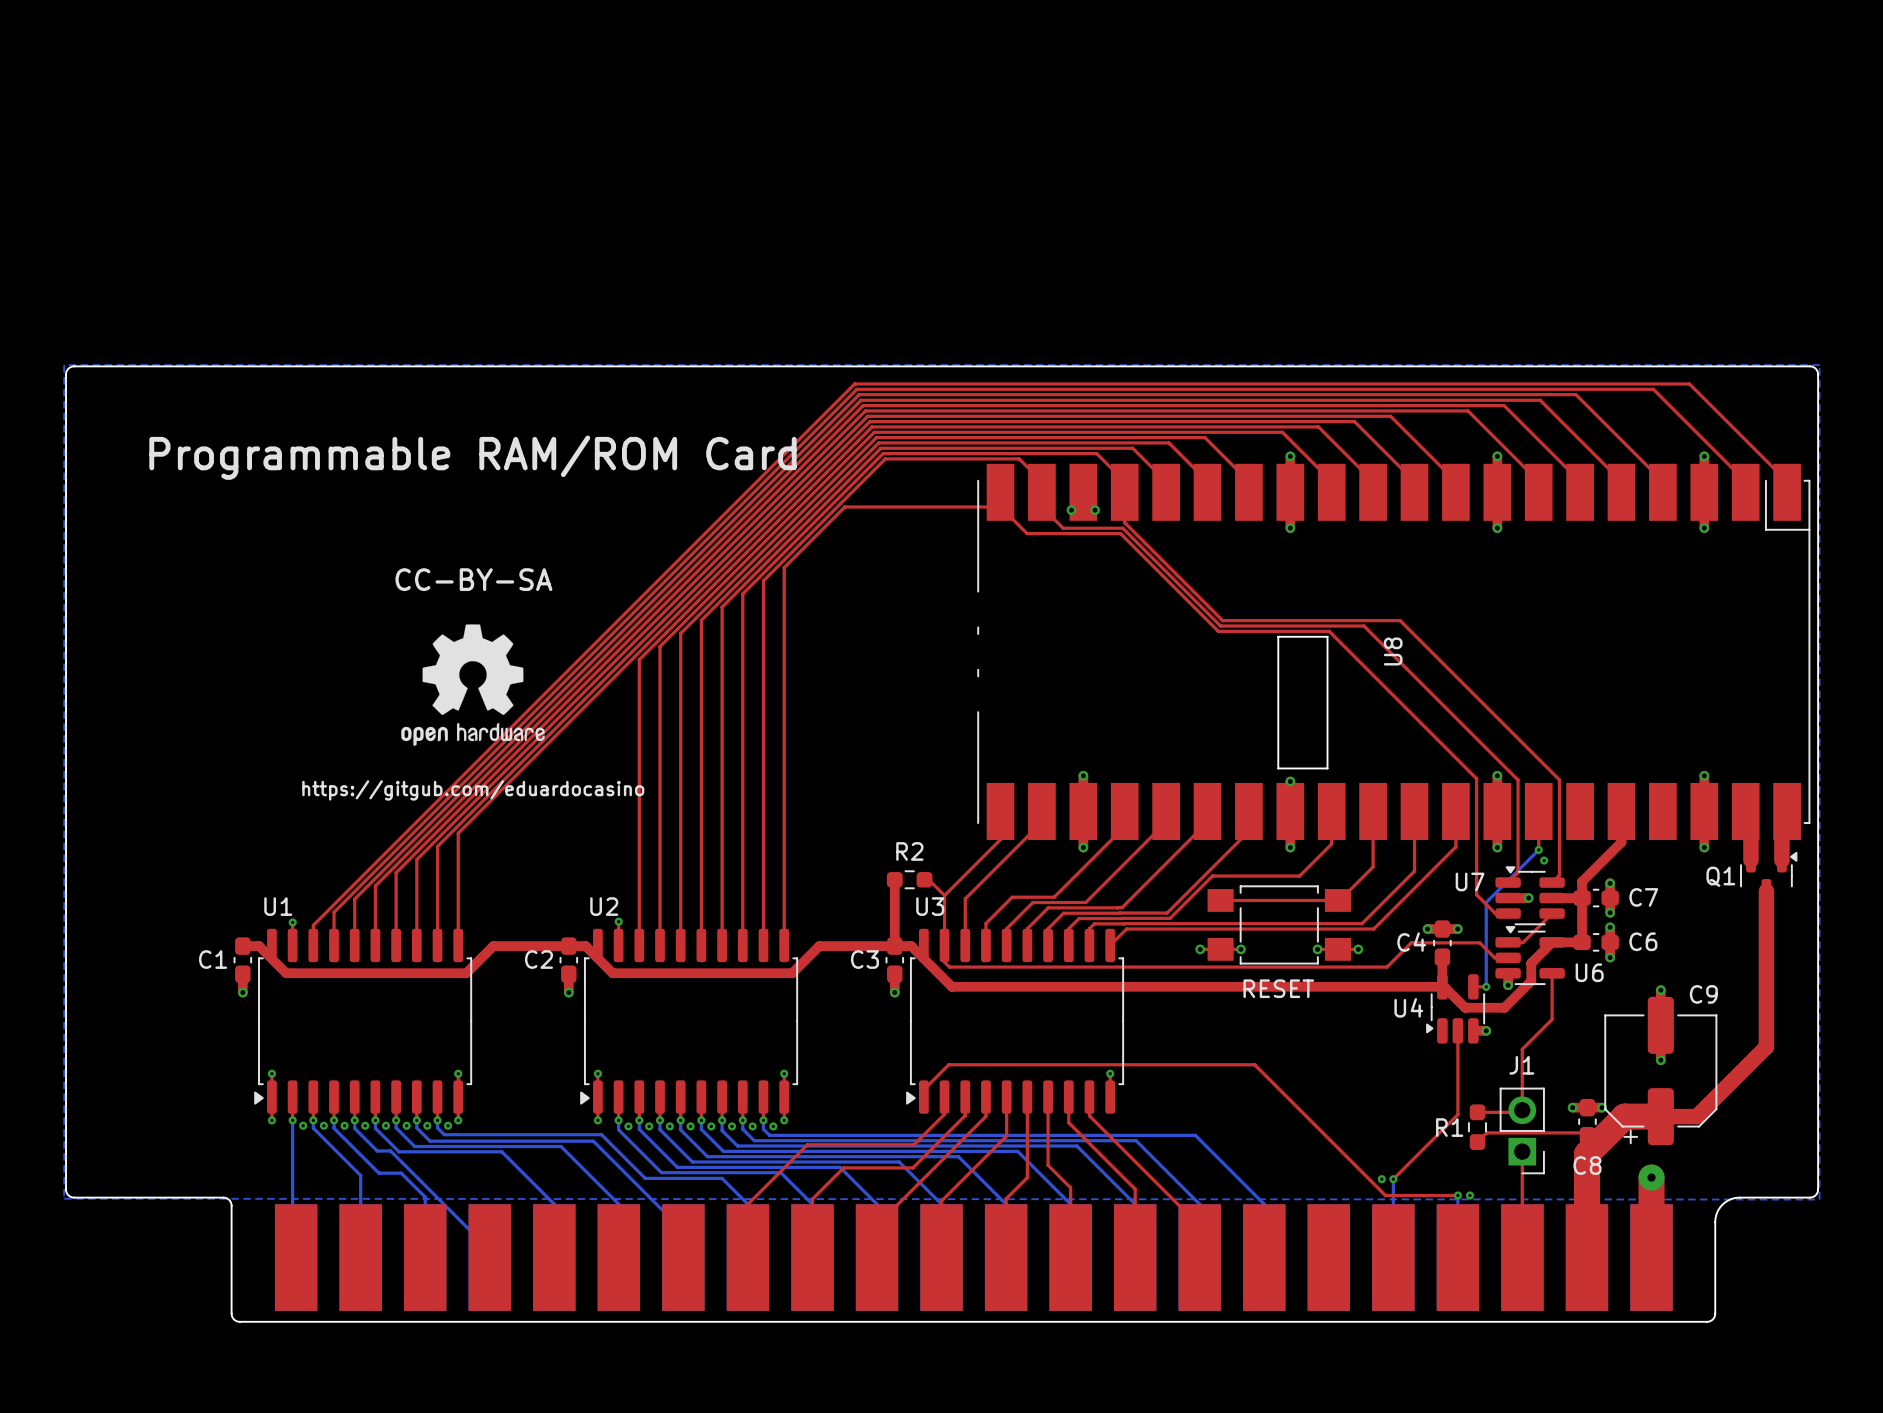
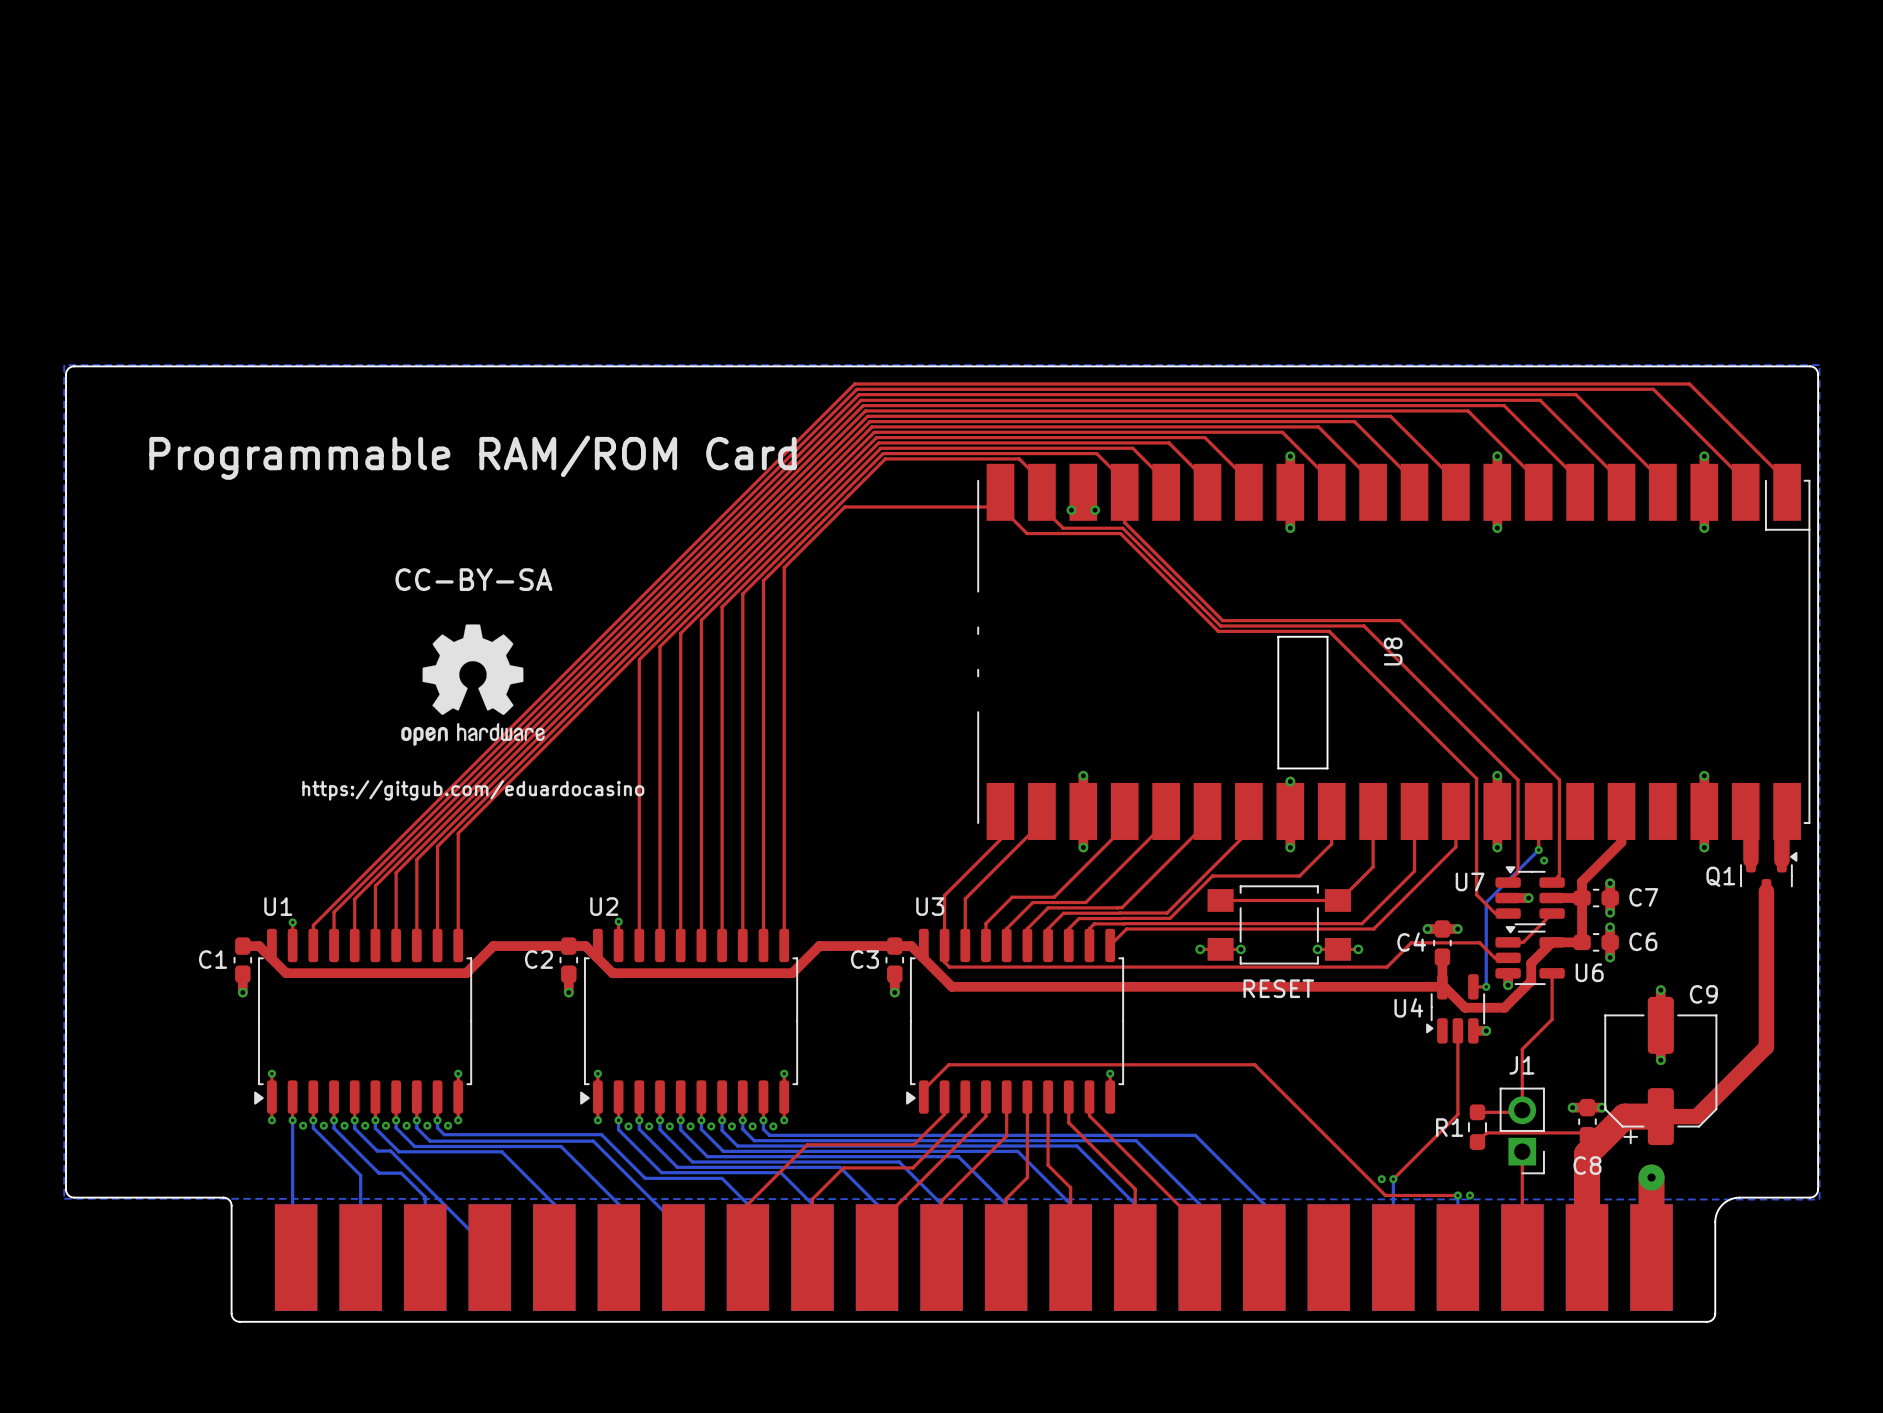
top track: (894, 879) (894, 946) -> none
R2: (909, 879) -> none
top track: (924, 879) (928, 879) (944, 895) -> none

